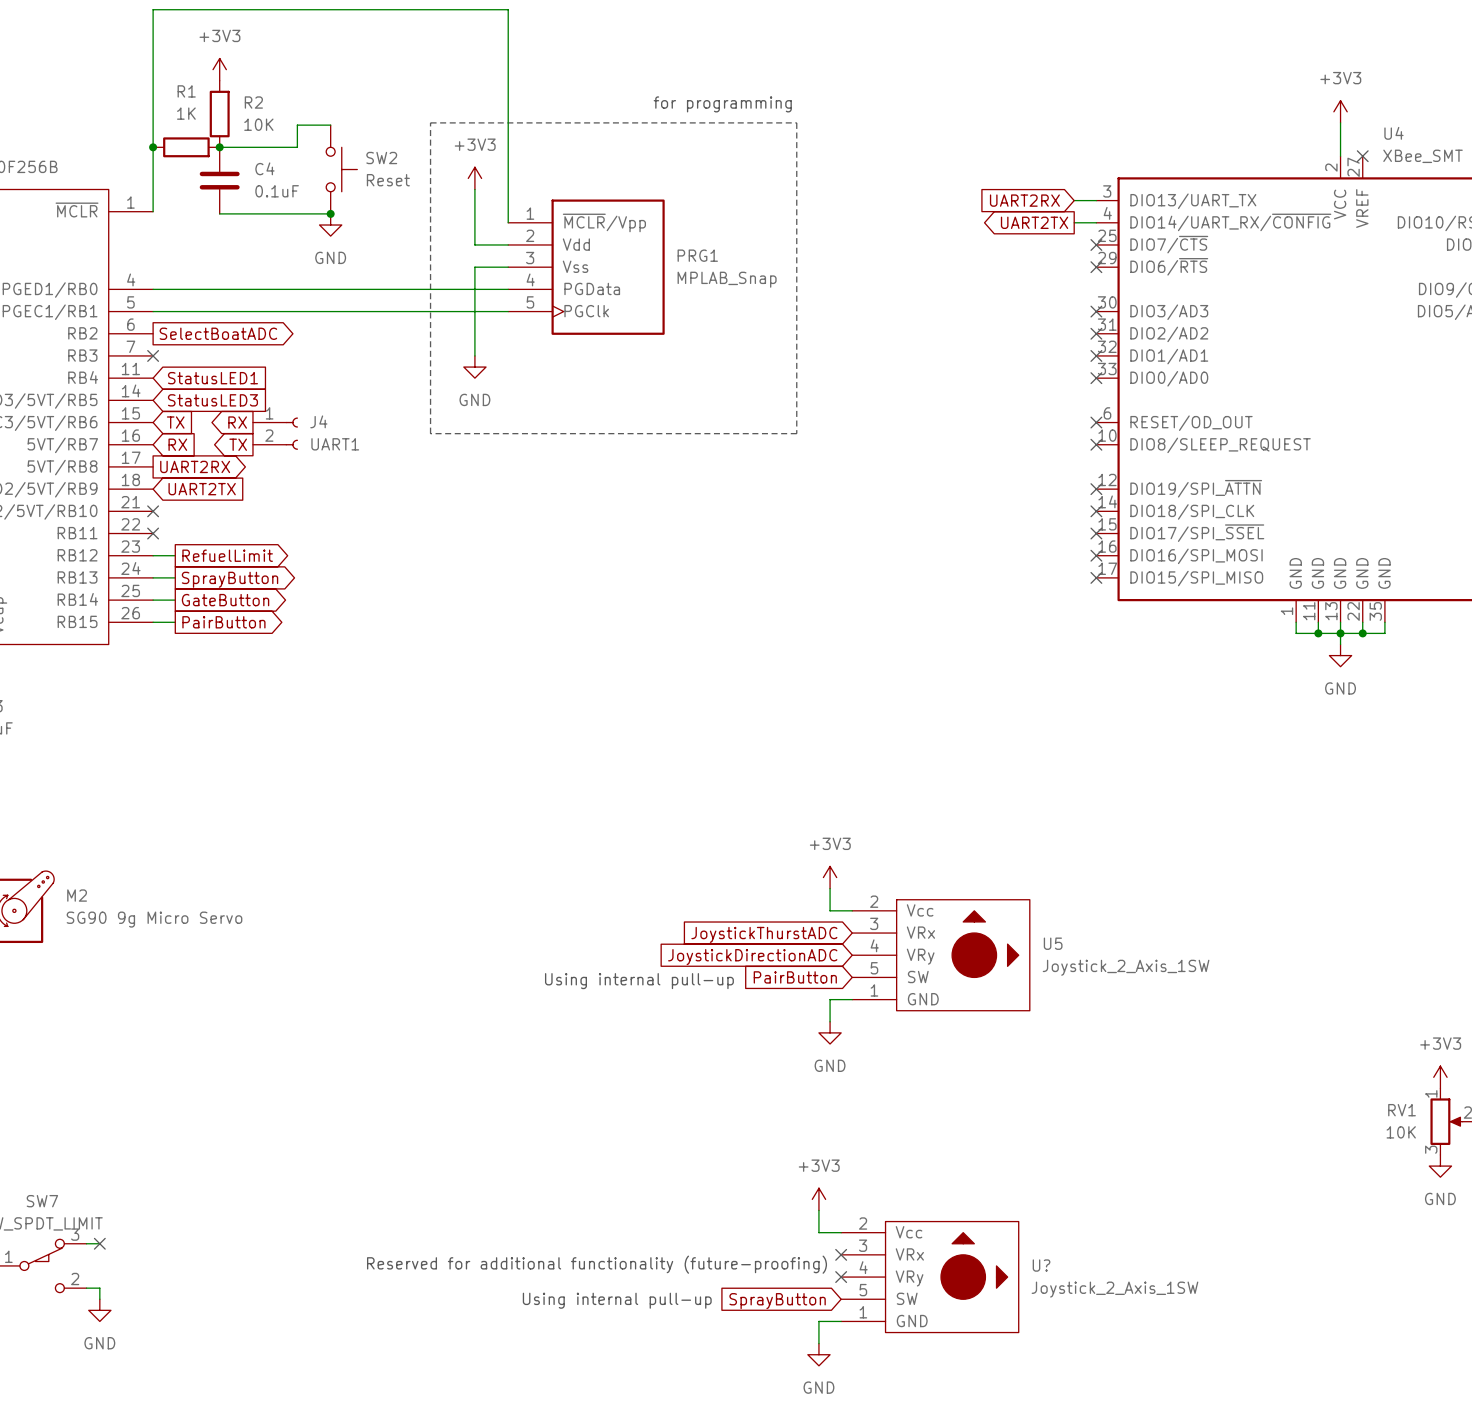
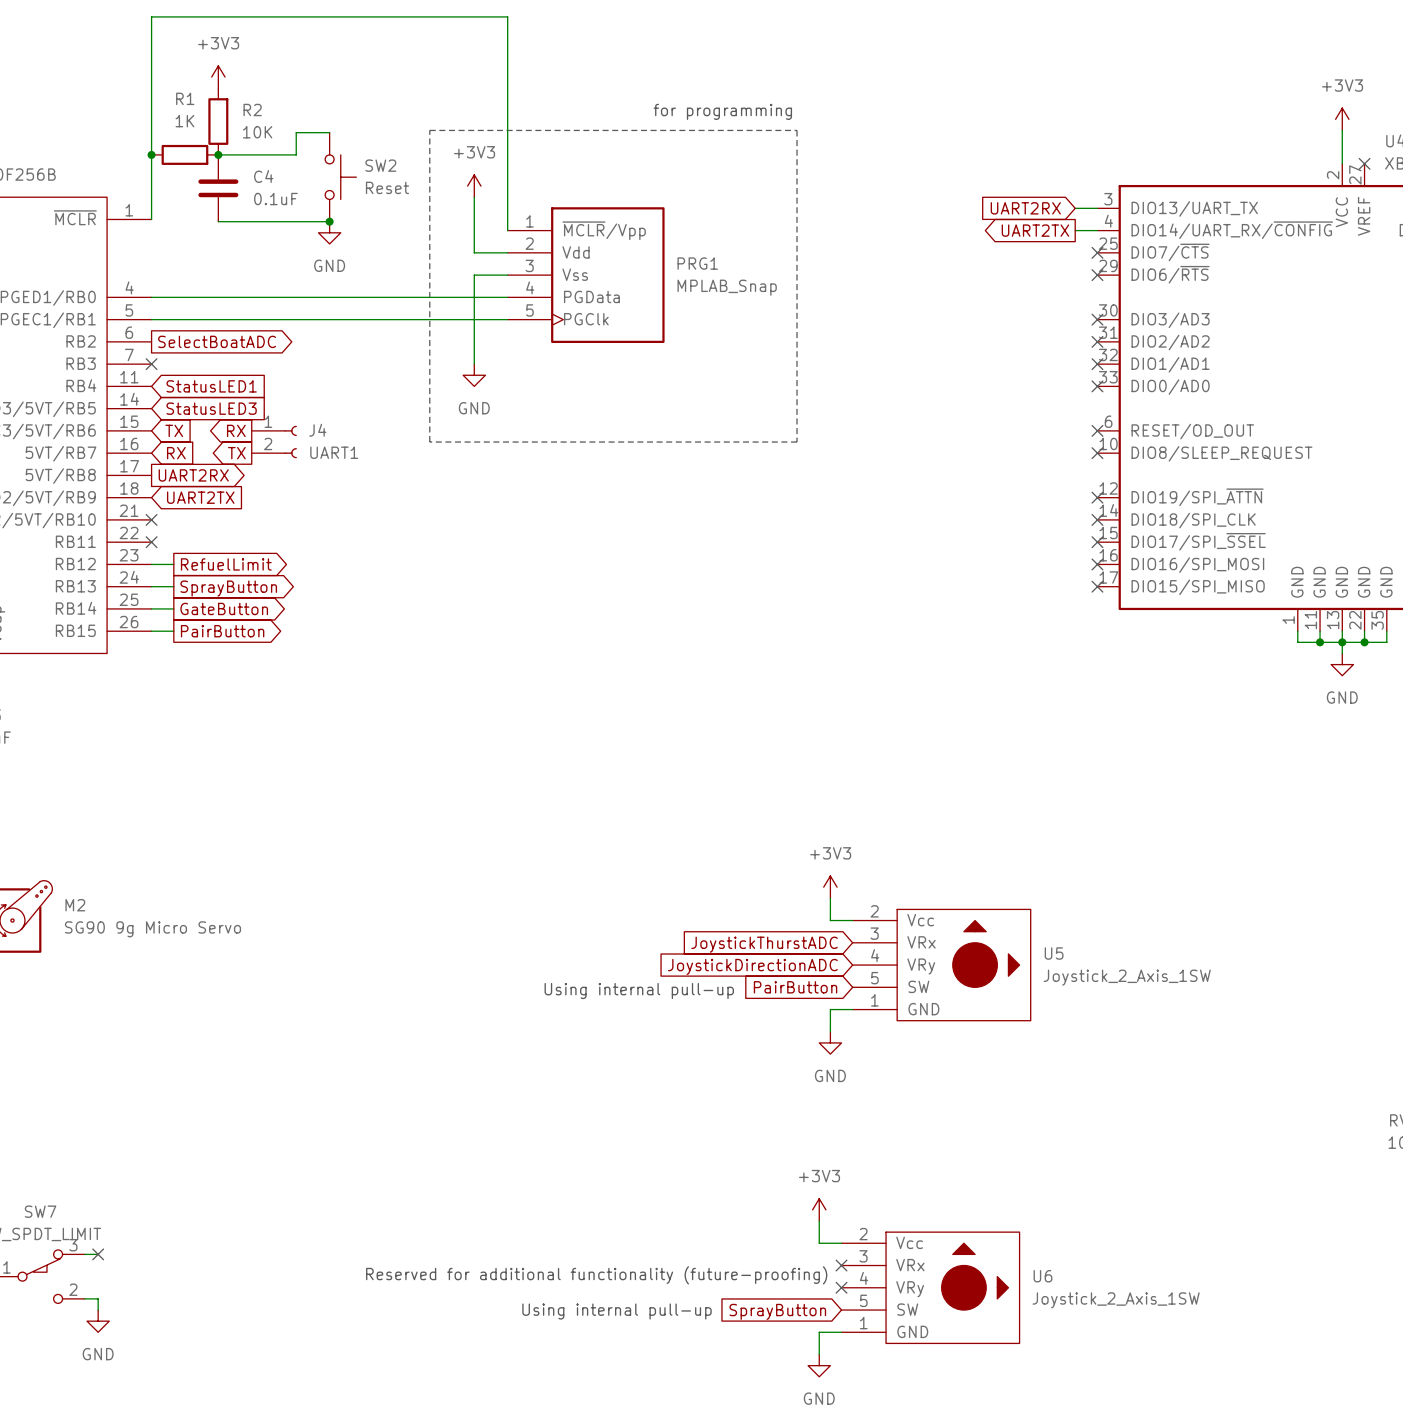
U? name: U? (1041, 1265) -> U6 (1042, 1276)

